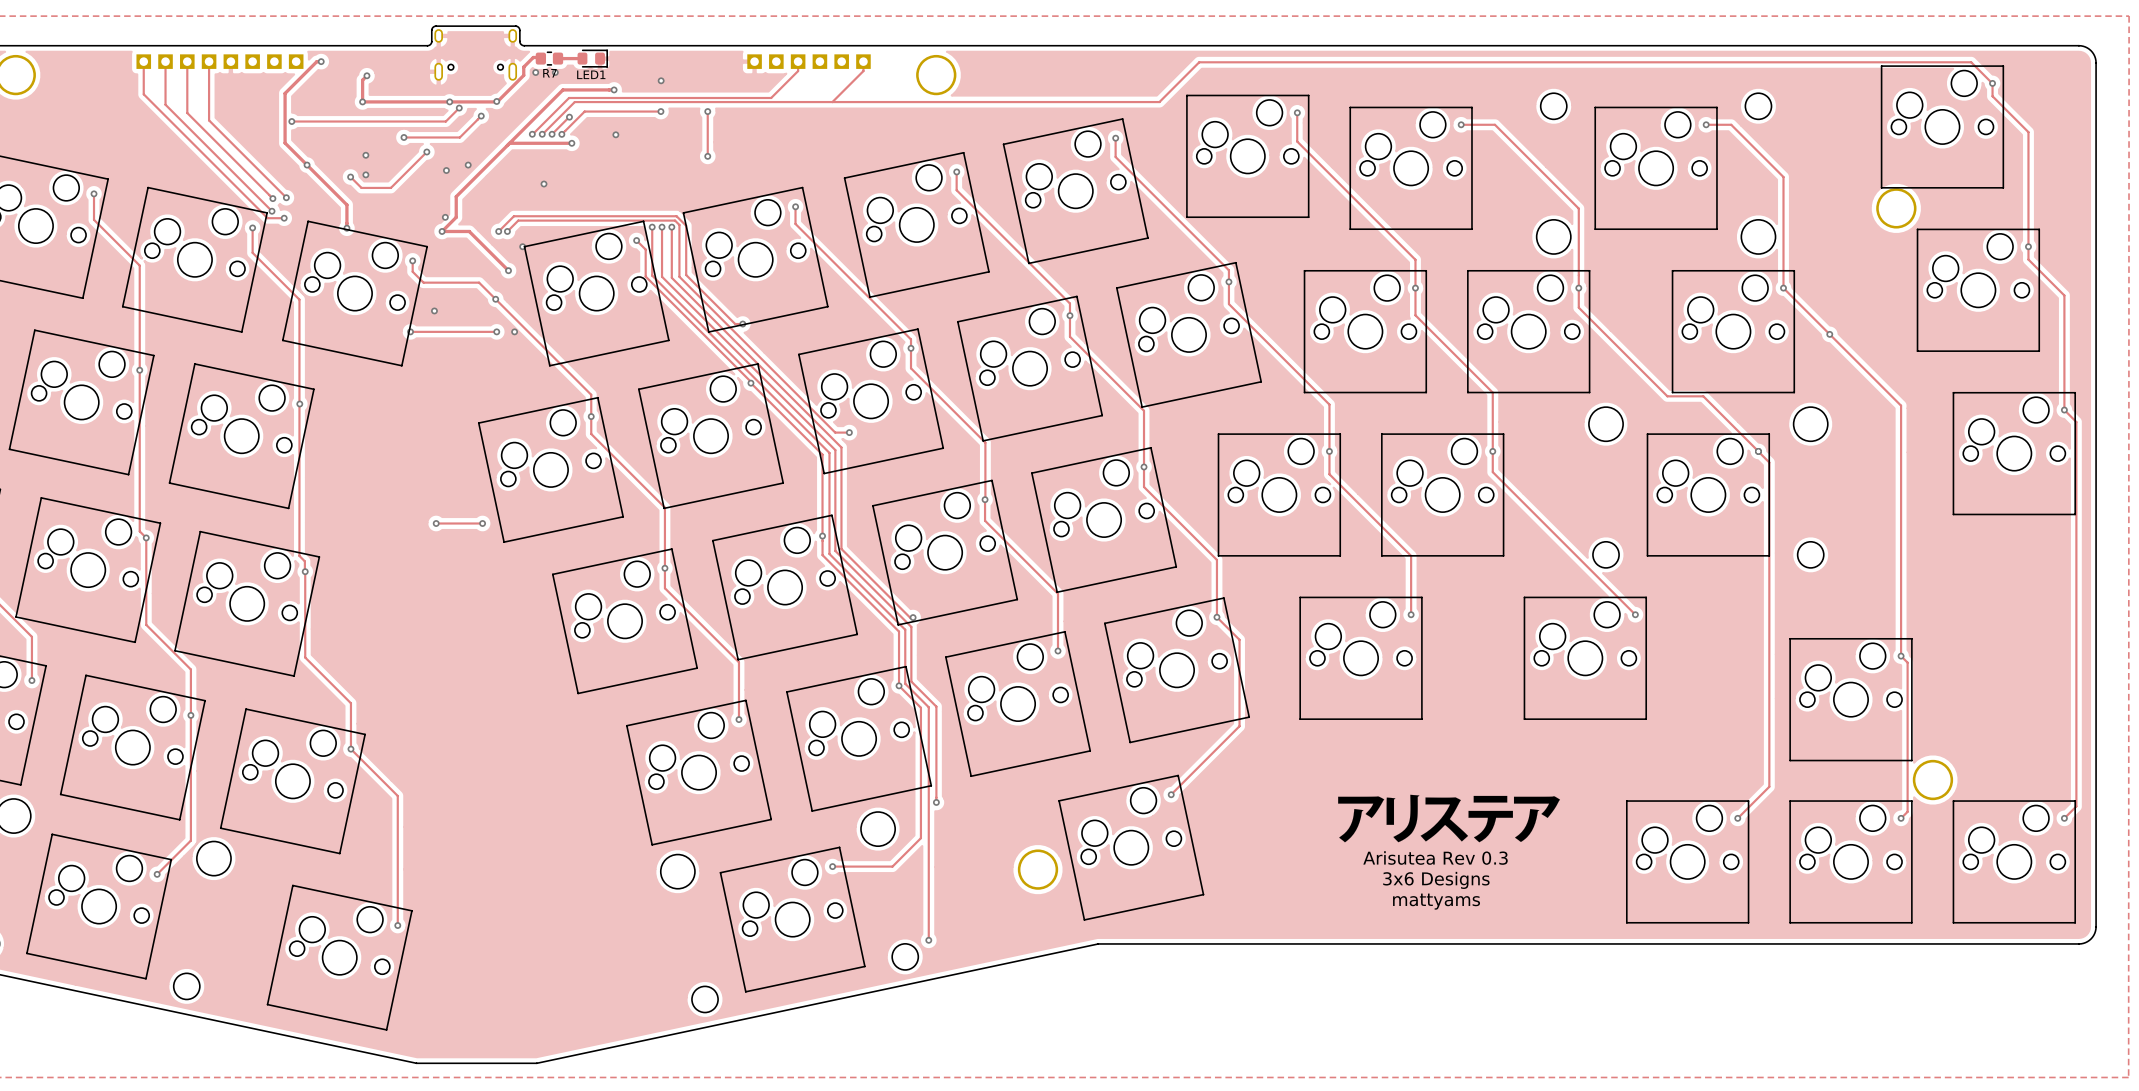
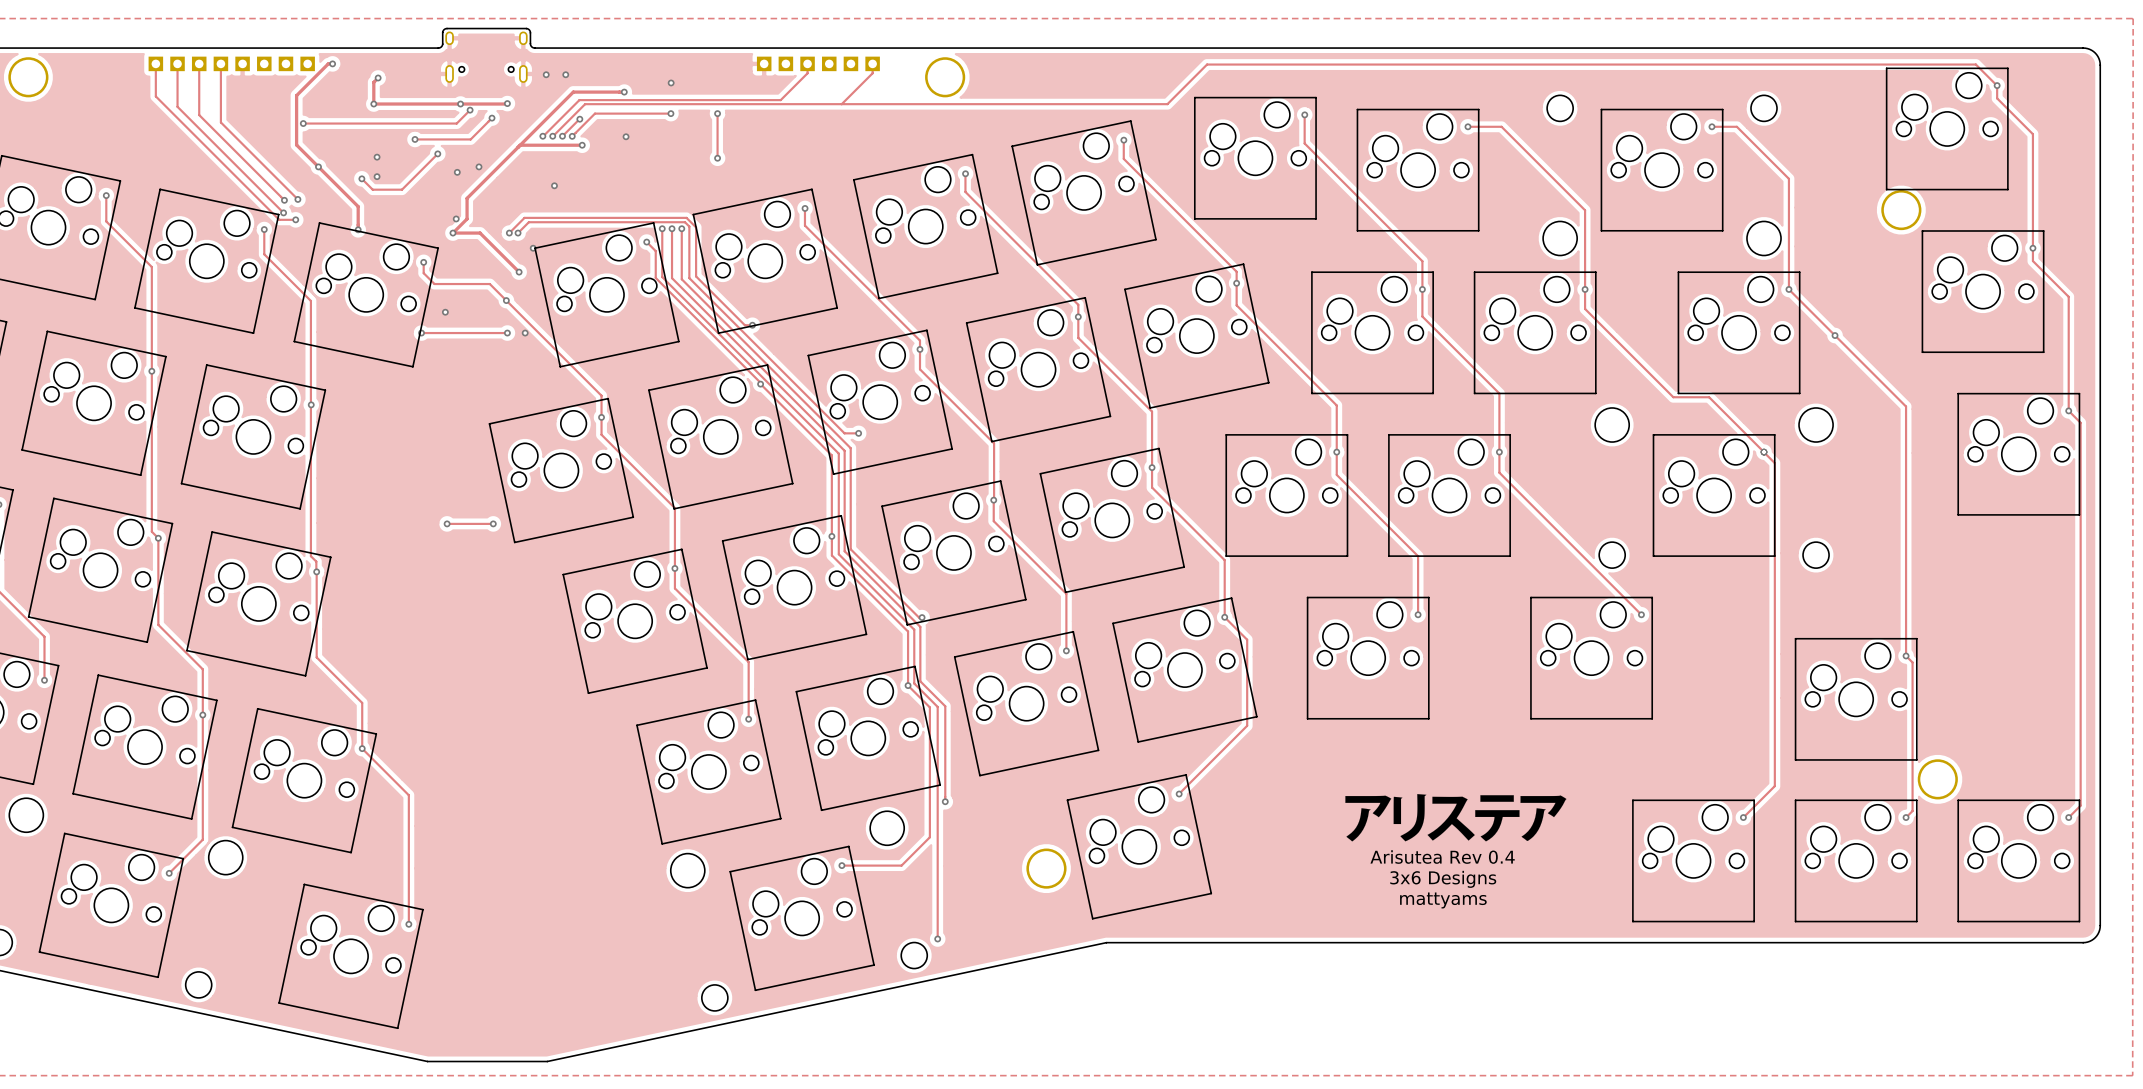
track: (540, 57) (533, 57) (523, 67) (523, 75) (496, 101) -> none
R7: (549, 58) -> none
track: (558, 58) (582, 58) -> none
LED1: (592, 58) -> none
text: Arisutea Rev 0.3 (1435, 857) -> Arisutea Rev 0.4 (1442, 857)

